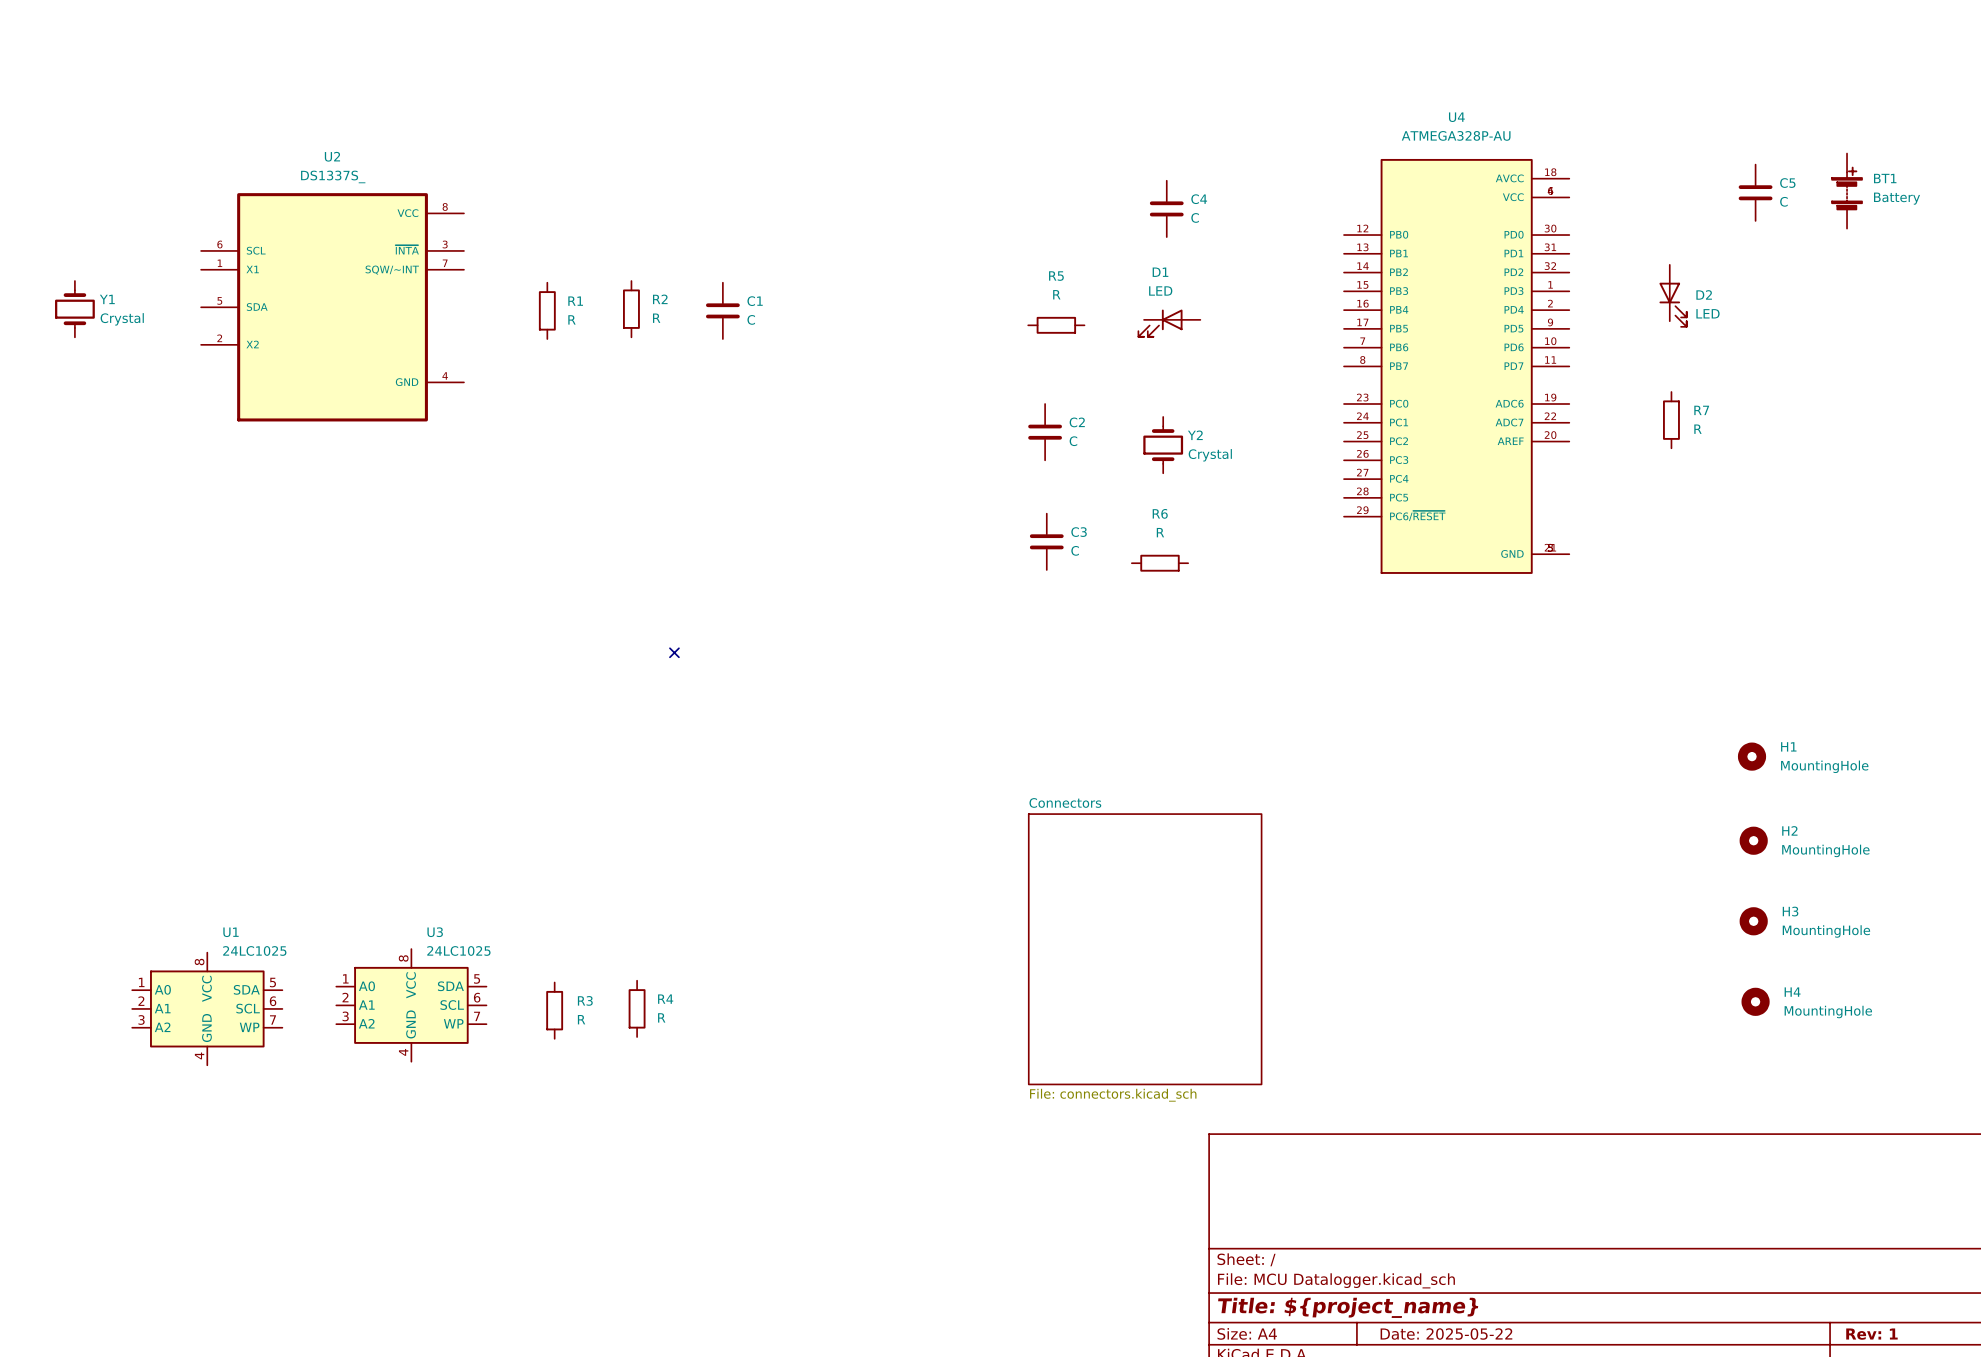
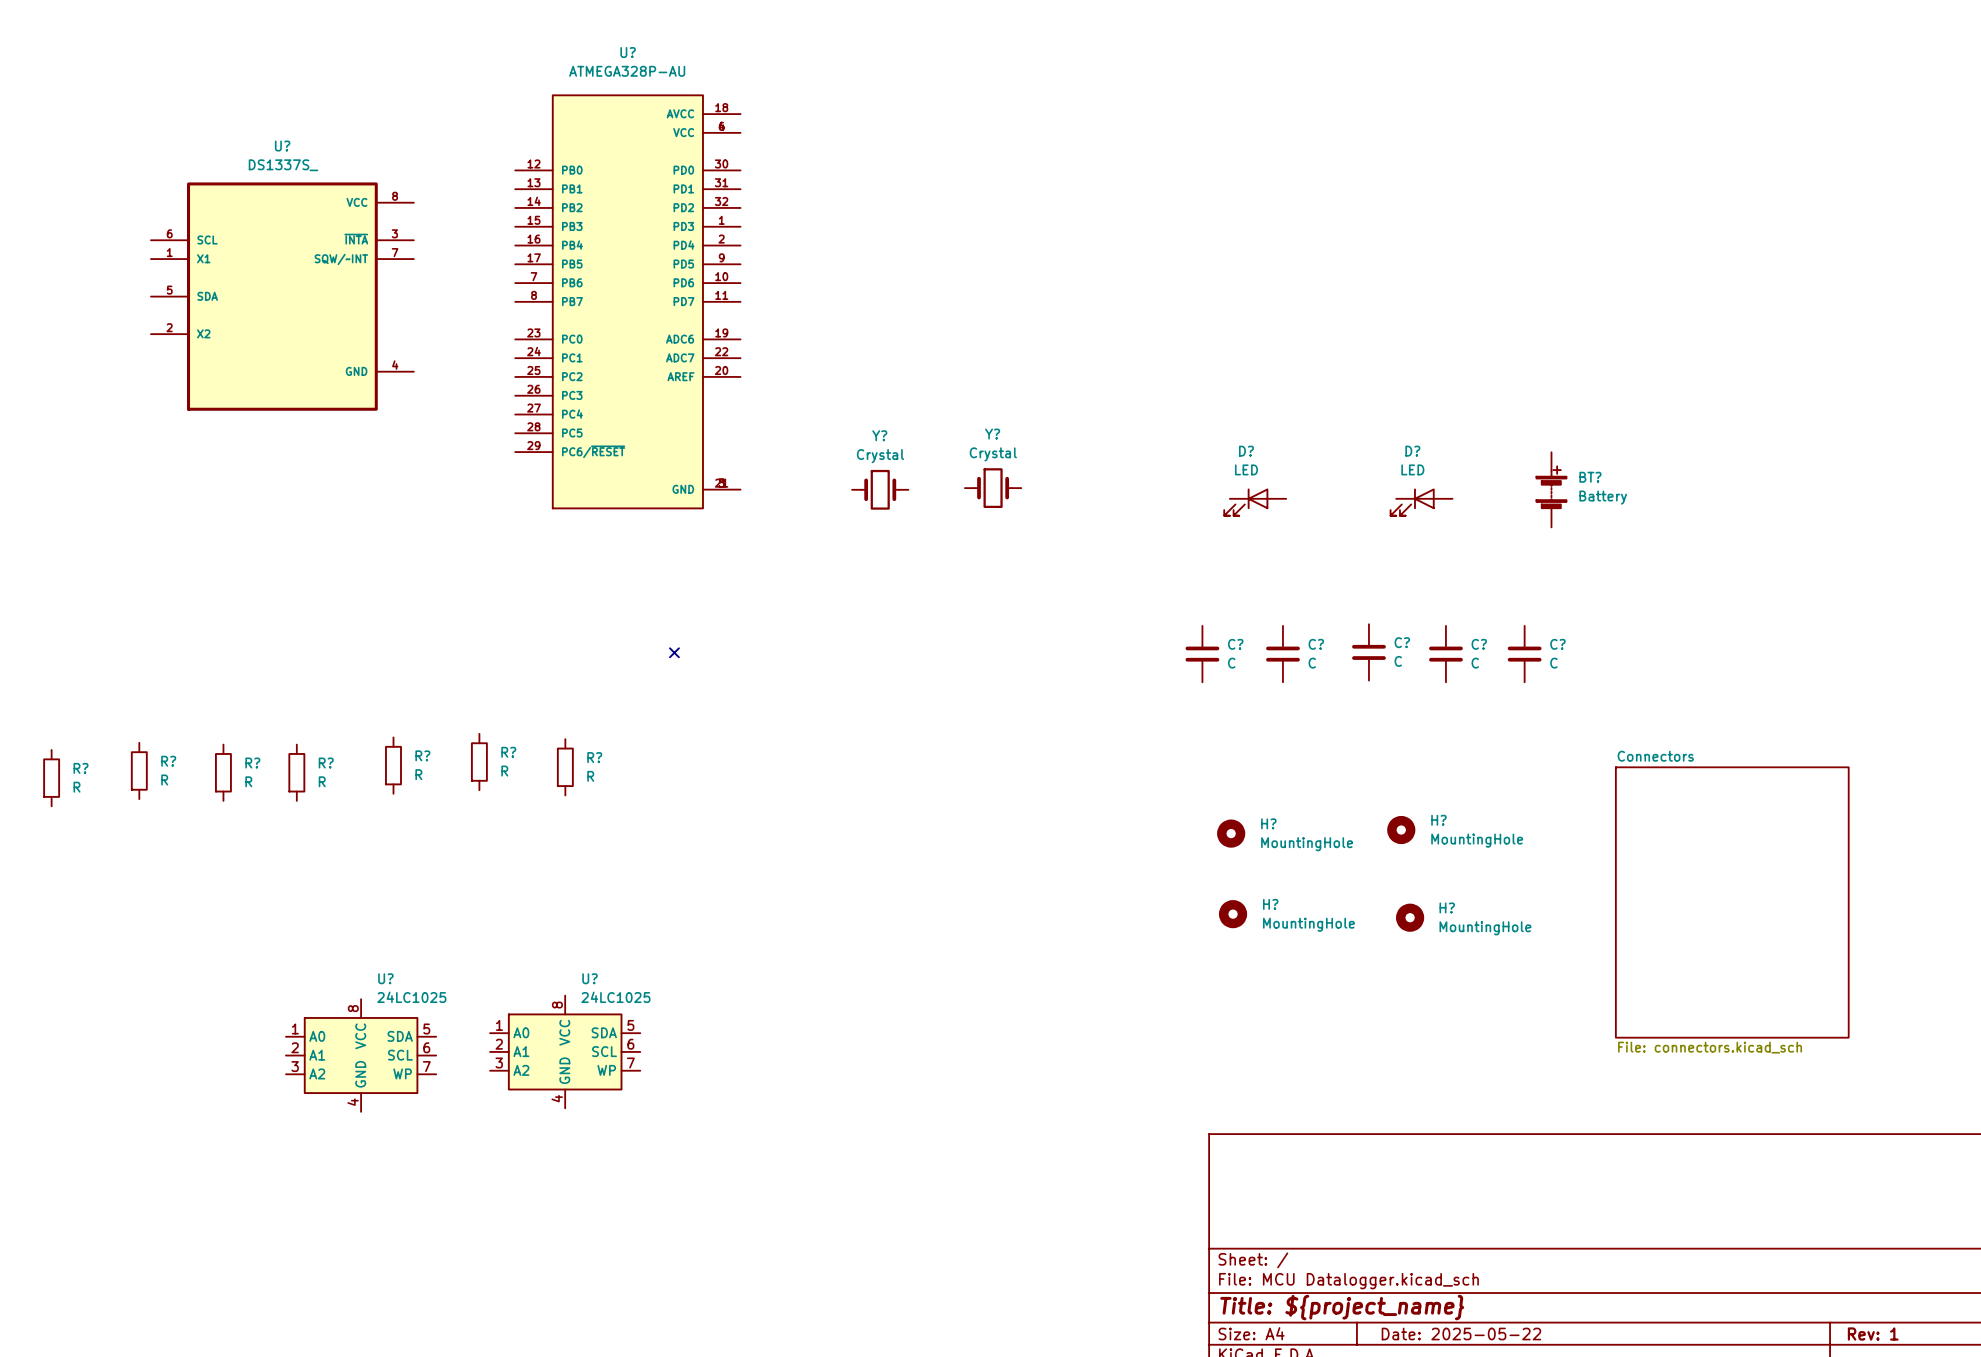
BT1: Battery (1847, 191) -> none
C5: C (1755, 192) -> none
C4: C (1166, 208) -> none
D2: LED (1673, 295) -> none
U?: none -> DS1337S_ (282, 296)
U?: none -> ATMEGA328P-AU (627, 301)
U2: DS1337S_ (332, 307) -> none
Y1: Crystal (74, 309) -> none
R2: R (631, 309) -> none
R1: R (547, 310) -> none
C1: C (722, 310) -> none
D1: LED (1169, 323) -> none
R5: R (1056, 325) -> none
U4: ATMEGA328P-AU (1456, 366) -> none
R7: R (1671, 420) -> none
C2: C (1045, 432) -> none
Y2: Crystal (1163, 445) -> none
Y?: none -> Crystal (993, 488)
Y?: none -> Crystal (880, 489)
BT?: none -> Battery (1551, 489)
D?: none -> LED (1255, 502)
D?: none -> LED (1421, 502)
C3: C (1046, 541) -> none
R6: R (1160, 563) -> none
C?: none -> C (1368, 652)
C?: none -> C (1202, 654)
C?: none -> C (1282, 654)
C?: none -> C (1445, 654)
C?: none -> C (1524, 654)
H1: MountingHole (1752, 756) -> none
R?: none -> R (479, 762)
R?: none -> R (393, 765)
R?: none -> R (565, 767)
R?: none -> R (139, 770)
R?: none -> R (223, 772)
R?: none -> R (296, 772)
R?: none -> R (51, 778)
H?: none -> MountingHole (1401, 830)
H?: none -> MountingHole (1231, 833)
H2: MountingHole (1753, 840) -> none
sheet Connectors: none -> File: connectors.kicad_sch (1732, 902)
H?: none -> MountingHole (1233, 914)
H?: none -> MountingHole (1410, 917)
H3: MountingHole (1753, 921) -> none
sheet Connectors: File: connectors.kicad_sch (1145, 949) -> none
H4: MountingHole (1755, 1001) -> none
U3: 24LC1025 (411, 1005) -> none
U1: 24LC1025 (207, 1008) -> none
R4: R (637, 1008) -> none
R3: R (554, 1010) -> none
U?: none -> 24LC1025 (565, 1051)
U?: none -> 24LC1025 (361, 1055)

